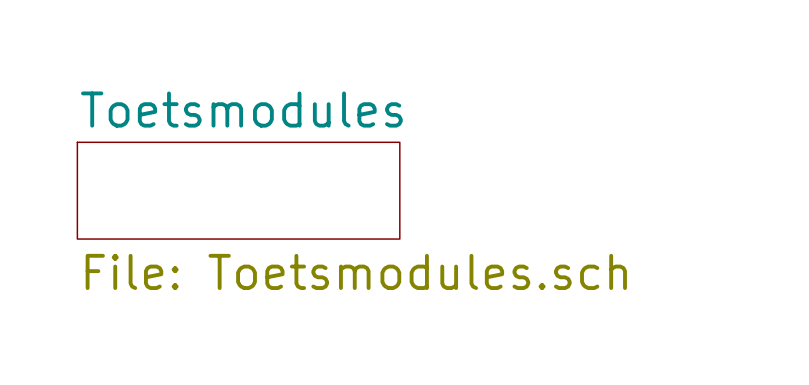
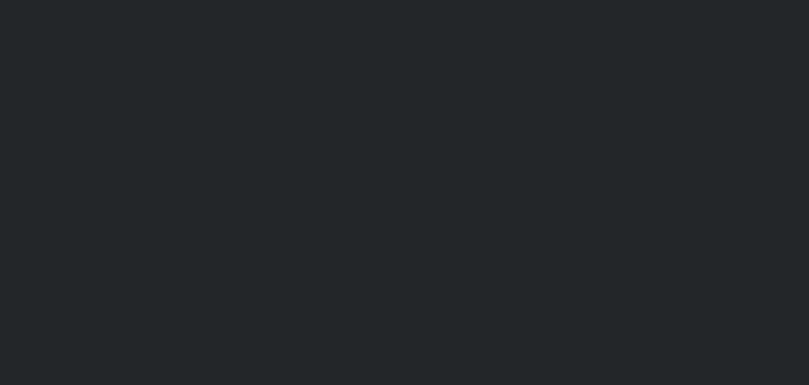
sheet Toetsmodules: File: Toetsmodules.sch (238, 190) -> none

